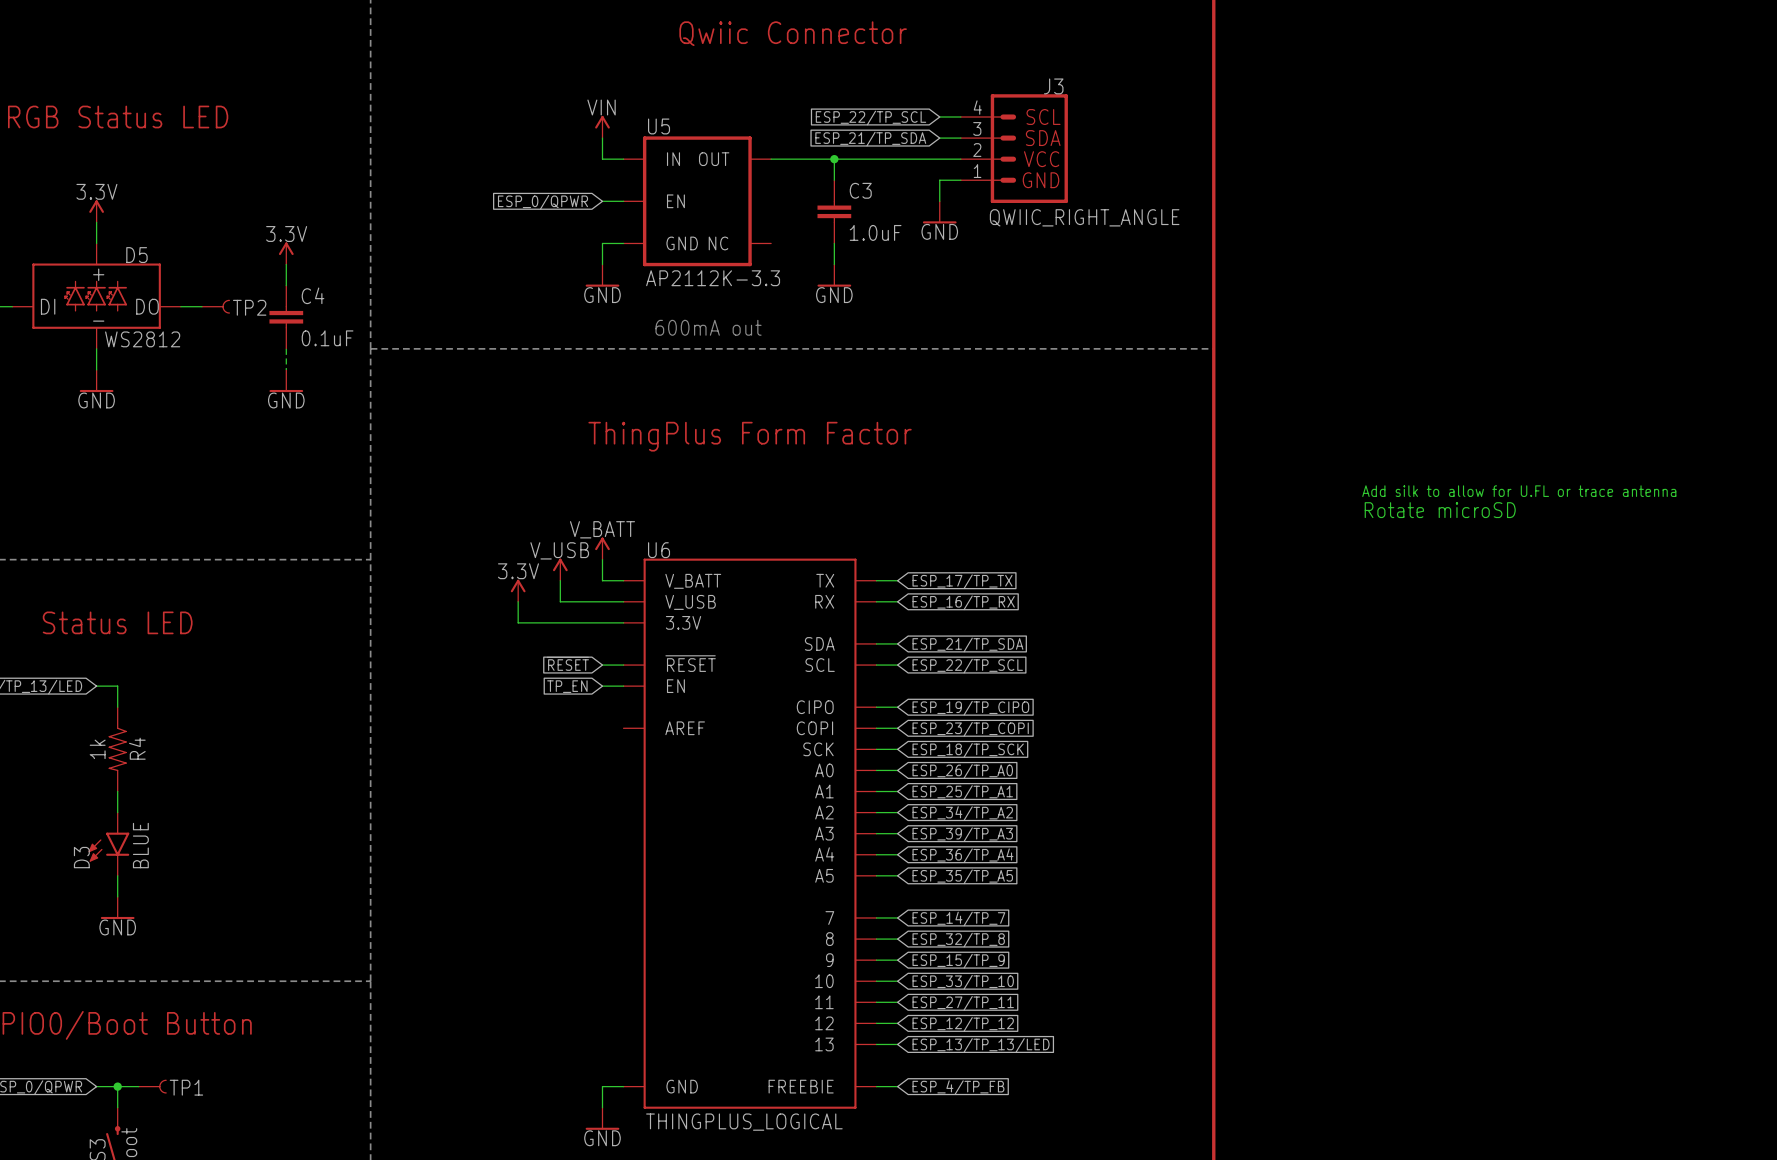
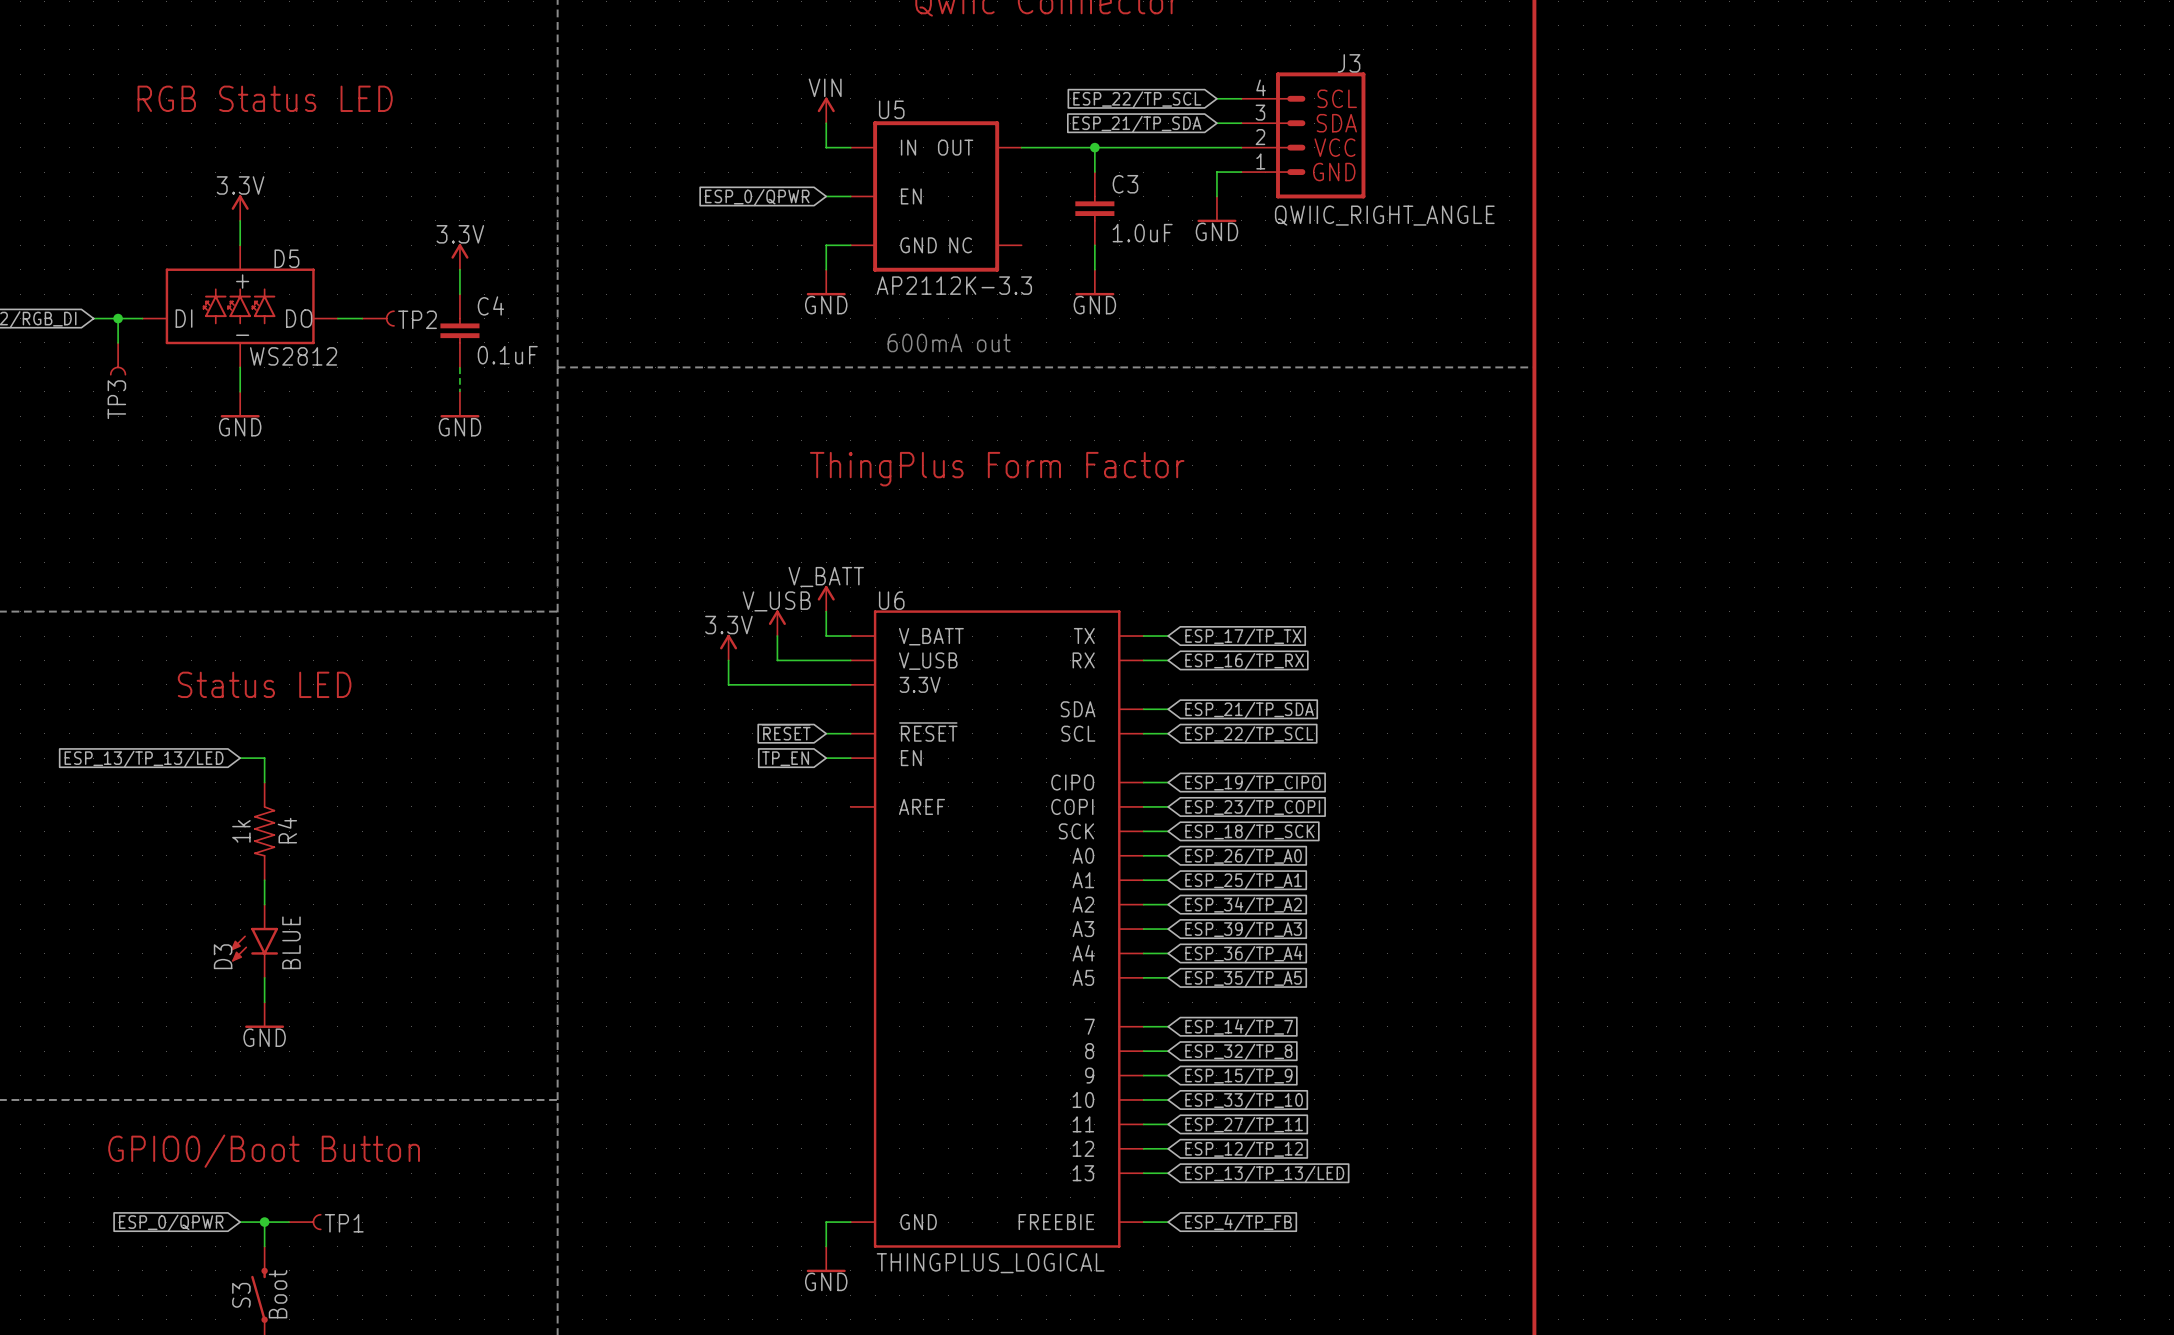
text: Add silk to allow for U.FL or trace antenna (1519, 491) -> none
text: Rotate microSD (1440, 510) -> none

